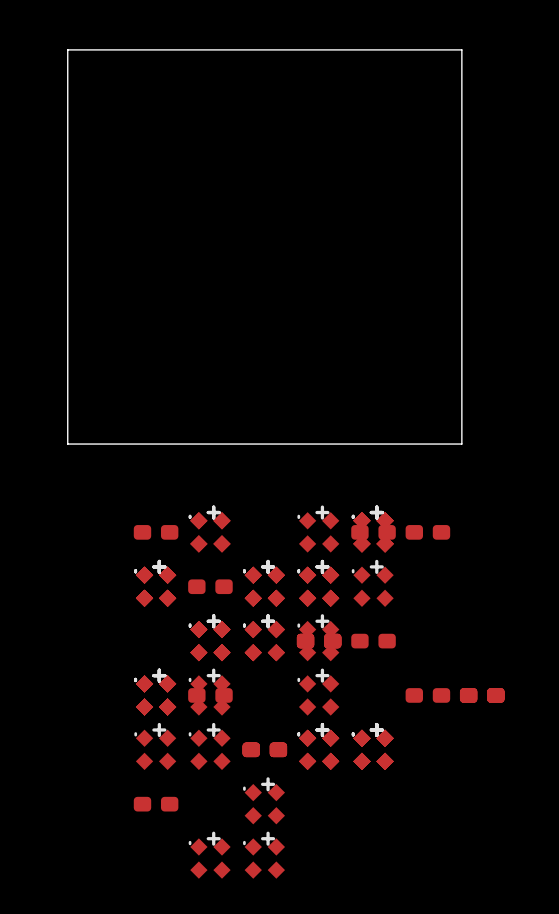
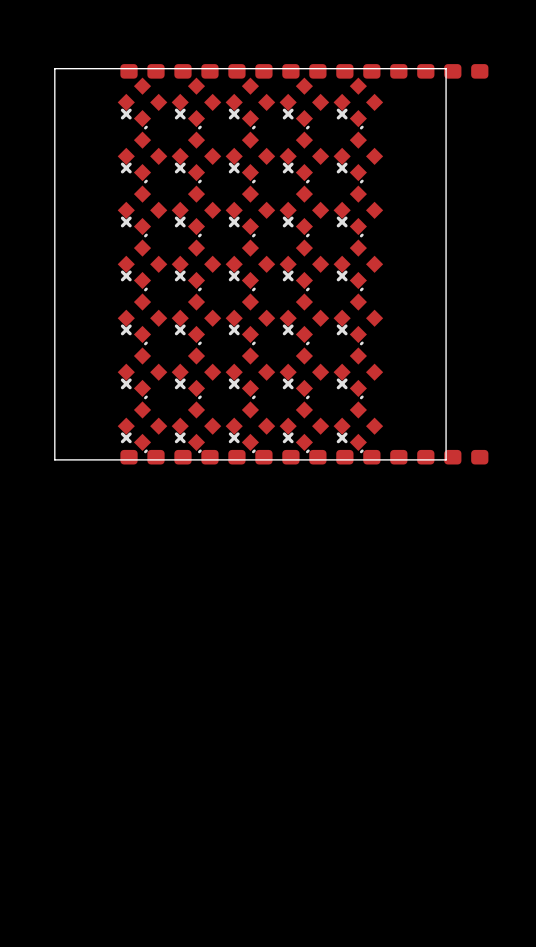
part: none -> (142, 71)
part: none -> (196, 71)
part: none -> (250, 71)
part: none -> (304, 71)
part: none -> (358, 71)
part: none -> (412, 71)
part: none -> (466, 71)
part: none -> (142, 103)
part: none -> (196, 103)
part: none -> (250, 103)
part: none -> (304, 103)
part: none -> (358, 103)
part: none -> (142, 157)
part: none -> (196, 157)
part: none -> (250, 157)
part: none -> (304, 157)
part: none -> (358, 157)
part: none -> (142, 211)
part: none -> (196, 211)
part: none -> (250, 211)
part: none -> (304, 211)
part: none -> (358, 211)
part: none -> (142, 265)
part: none -> (196, 265)
part: none -> (250, 265)
part: none -> (304, 265)
part: none -> (358, 265)
part: none -> (142, 319)
part: none -> (196, 319)
part: none -> (250, 319)
part: none -> (304, 319)
part: none -> (358, 319)
part: none -> (142, 373)
part: none -> (196, 373)
part: none -> (250, 373)
part: none -> (304, 373)
part: none -> (358, 373)
part: none -> (142, 427)
part: none -> (196, 427)
part: none -> (250, 427)
part: none -> (304, 427)
part: none -> (358, 427)
part: none -> (142, 457)
part: none -> (196, 457)
part: none -> (250, 457)
part: none -> (304, 457)
part: none -> (358, 457)
part: none -> (412, 457)
part: none -> (466, 457)
part: (209, 529) -> none
part: (318, 529) -> none
part: (372, 529) -> none
part: (156, 532) -> none
part: (373, 532) -> none
part: (427, 532) -> none
part: (155, 583) -> none
part: (264, 583) -> none
part: (318, 583) -> none
part: (372, 583) -> none
part: (210, 586) -> none
part: (209, 637) -> none
part: (264, 637) -> none
part: (318, 637) -> none
part: (319, 641) -> none
part: (373, 641) -> none
part: (155, 692) -> none
part: (209, 692) -> none
part: (318, 692) -> none
part: (210, 695) -> none
part: (427, 695) -> none
part: (482, 695) -> none
part: (155, 746) -> none
part: (209, 746) -> none
part: (318, 746) -> none
part: (372, 746) -> none
part: (264, 749) -> none
part: (264, 800) -> none
part: (156, 804) -> none
part: (209, 855) -> none
part: (264, 855) -> none

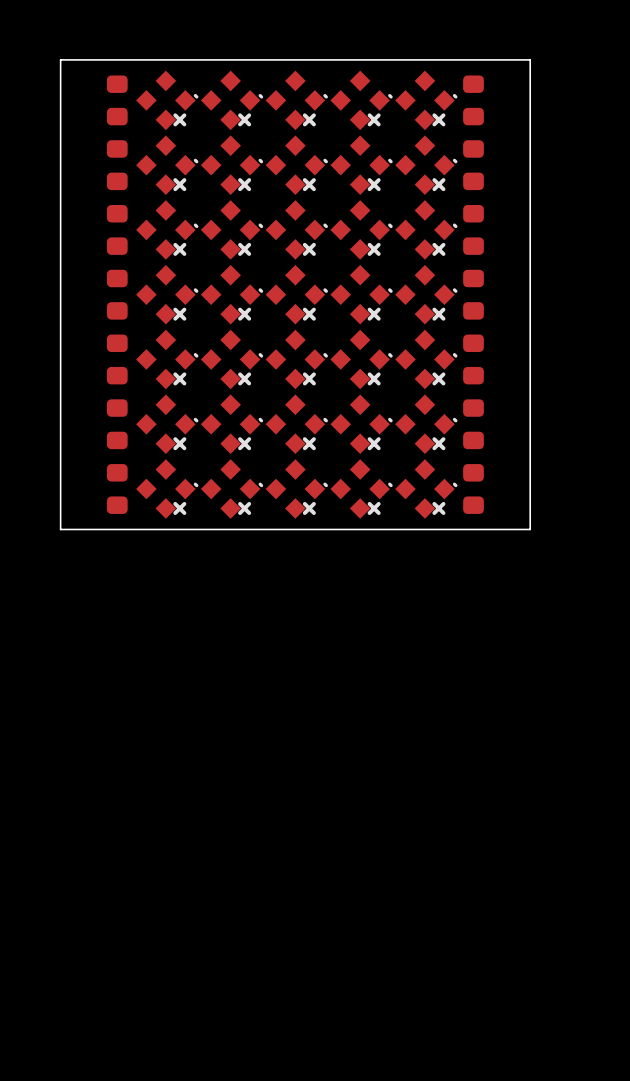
part: (142, 71) -> none
part: (196, 71) -> none
part: (250, 71) -> none
part: (304, 71) -> none
part: (358, 71) -> none
part: (412, 71) -> none
part: (466, 71) -> none
part: none -> (117, 100)
part: none -> (473, 100)
part rotation: 0° (142, 103) -> 90° counterclockwise (167, 100)
part rotation: 0° (196, 103) -> 90° counterclockwise (232, 100)
part rotation: 0° (250, 103) -> 90° counterclockwise (296, 100)
part rotation: 0° (304, 103) -> 90° counterclockwise (361, 100)
part rotation: 0° (358, 103) -> 90° counterclockwise (426, 100)
part: none -> (117, 165)
part: none -> (473, 165)
part rotation: 0° (142, 157) -> 90° counterclockwise (167, 165)
part rotation: 0° (196, 157) -> 90° counterclockwise (232, 165)
part rotation: 0° (250, 157) -> 90° counterclockwise (296, 165)
part rotation: 0° (304, 157) -> 90° counterclockwise (361, 165)
part rotation: 0° (358, 157) -> 90° counterclockwise (426, 165)
part: none -> (117, 229)
part: none -> (473, 229)
part rotation: 0° (142, 211) -> 90° counterclockwise (167, 229)
part rotation: 0° (196, 211) -> 90° counterclockwise (232, 229)
part rotation: 0° (250, 211) -> 90° counterclockwise (296, 229)
part rotation: 0° (304, 211) -> 90° counterclockwise (361, 229)
part rotation: 0° (358, 211) -> 90° counterclockwise (426, 229)
part: none -> (117, 294)
part: none -> (473, 294)
part rotation: 0° (142, 265) -> 90° counterclockwise (167, 294)
part rotation: 0° (196, 265) -> 90° counterclockwise (232, 294)
part rotation: 0° (250, 265) -> 90° counterclockwise (296, 294)
part rotation: 0° (304, 265) -> 90° counterclockwise (361, 294)
part rotation: 0° (358, 265) -> 90° counterclockwise (426, 294)
part: none -> (117, 359)
part: none -> (473, 359)
part rotation: 0° (142, 319) -> 90° counterclockwise (167, 359)
part rotation: 0° (196, 319) -> 90° counterclockwise (232, 359)
part rotation: 0° (250, 319) -> 90° counterclockwise (296, 359)
part rotation: 0° (304, 319) -> 90° counterclockwise (361, 359)
part rotation: 0° (358, 319) -> 90° counterclockwise (426, 359)
part: none -> (117, 424)
part: none -> (473, 424)
part rotation: 0° (142, 373) -> 90° counterclockwise (167, 424)
part rotation: 0° (196, 373) -> 90° counterclockwise (232, 424)
part rotation: 0° (250, 373) -> 90° counterclockwise (296, 424)
part rotation: 0° (304, 373) -> 90° counterclockwise (361, 424)
part rotation: 0° (358, 373) -> 90° counterclockwise (426, 424)
part: none -> (117, 489)
part: none -> (473, 489)
part rotation: 0° (142, 427) -> 90° counterclockwise (167, 489)
part rotation: 0° (196, 427) -> 90° counterclockwise (232, 489)
part rotation: 0° (250, 427) -> 90° counterclockwise (296, 489)
part rotation: 0° (304, 427) -> 90° counterclockwise (361, 489)
part rotation: 0° (358, 427) -> 90° counterclockwise (426, 489)
part: (142, 457) -> none
part: (196, 457) -> none
part: (250, 457) -> none
part: (304, 457) -> none
part: (358, 457) -> none
part: (412, 457) -> none
part: (466, 457) -> none

